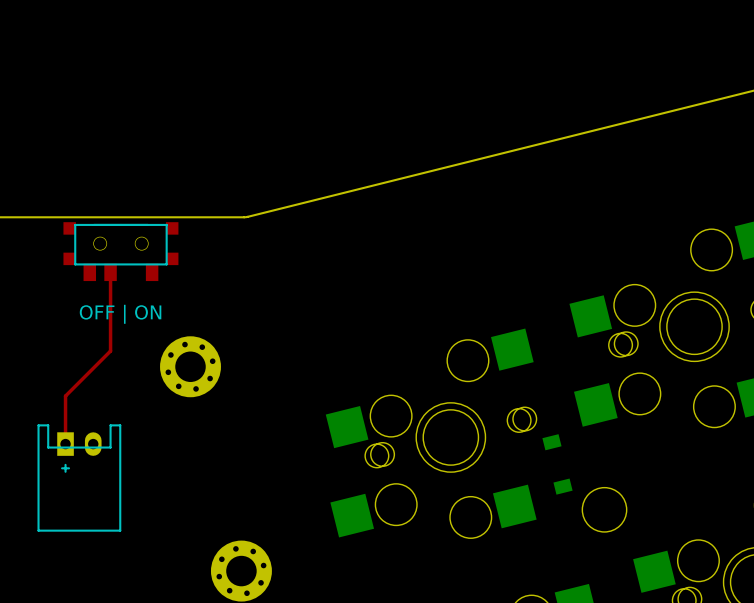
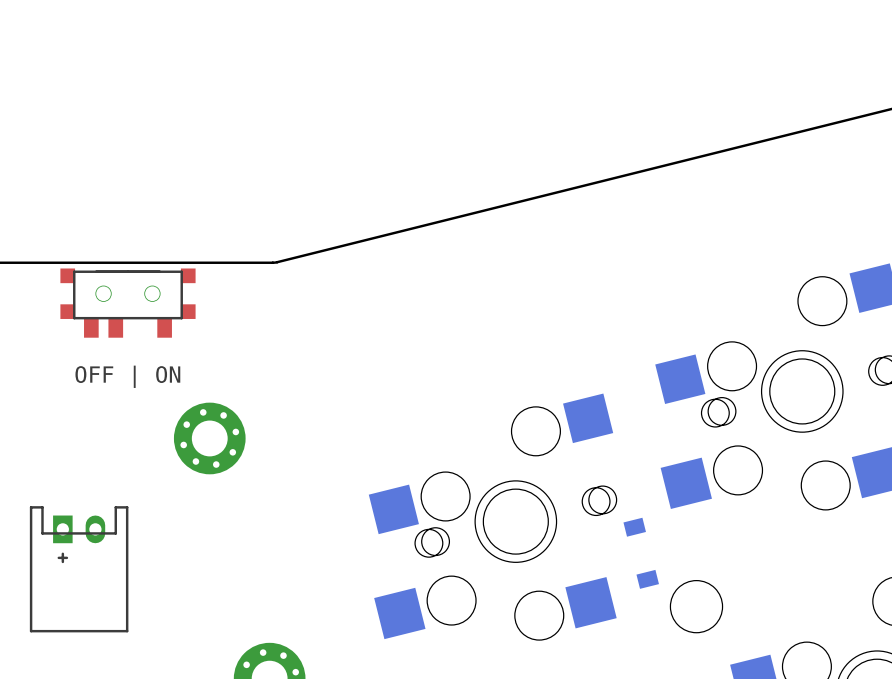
top track: (110, 272) (110, 351) (65, 396) (65, 444) -> none

